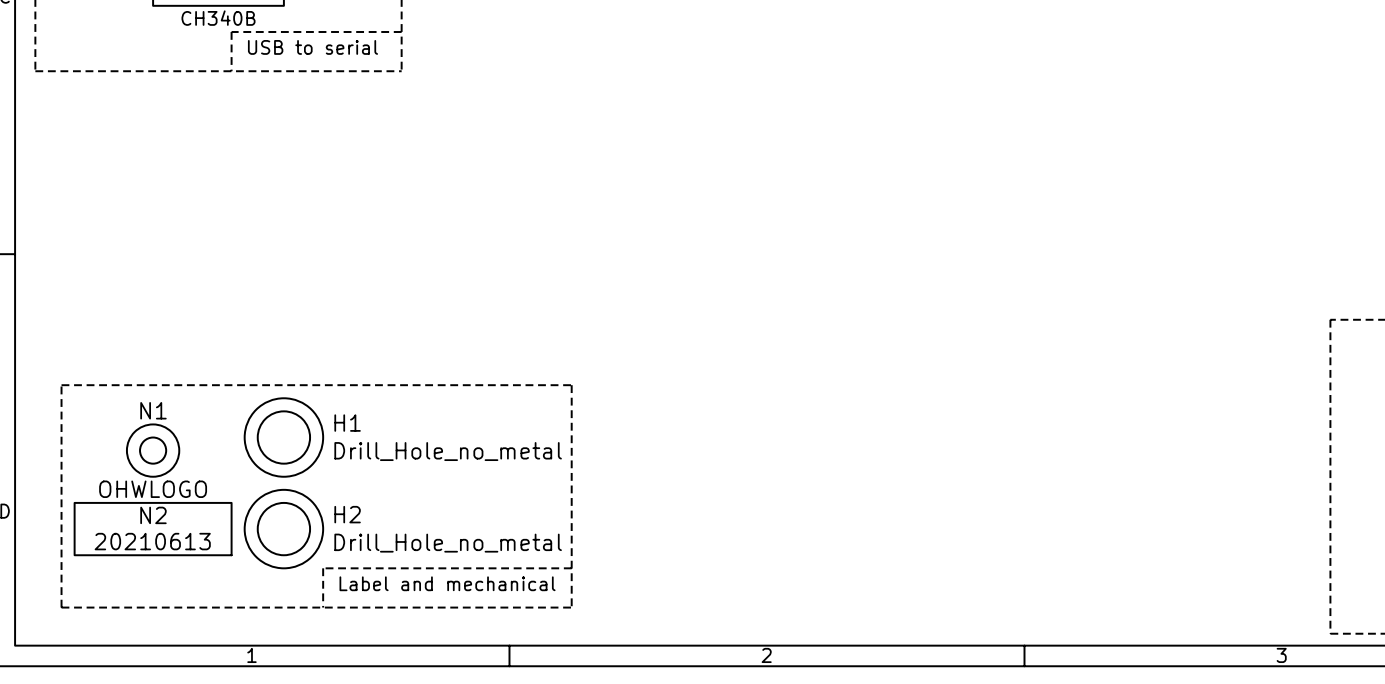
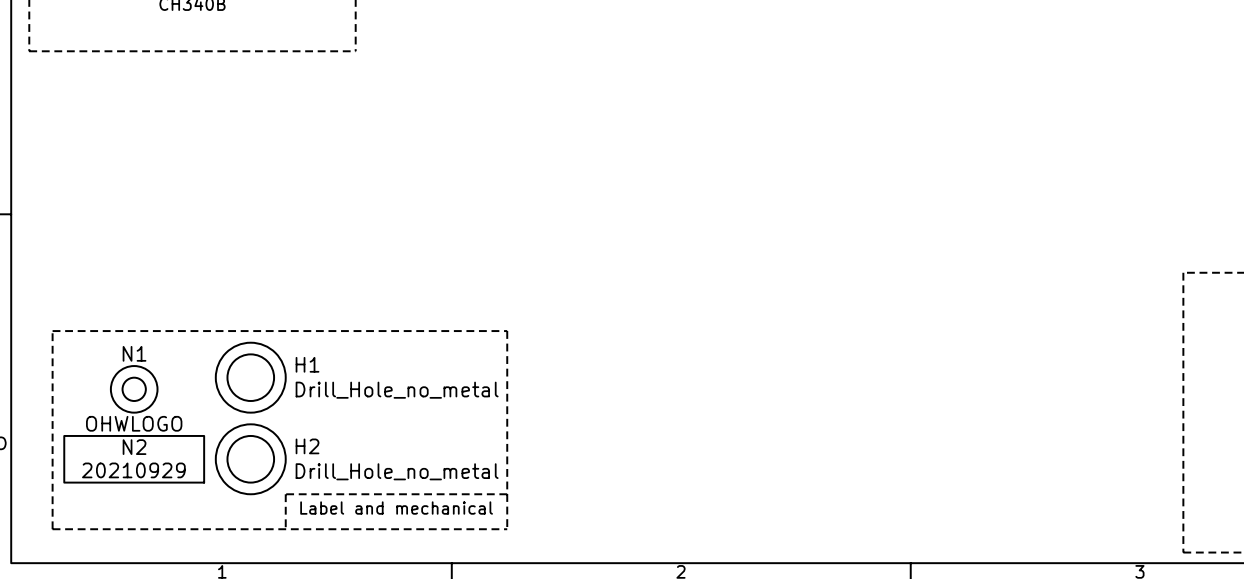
line: (401, 31) (231, 31) (231, 71) -> none
text: USB to serial (312, 47) -> none
N2 value: 20210613 (152, 541) -> 20210929 (133, 470)

